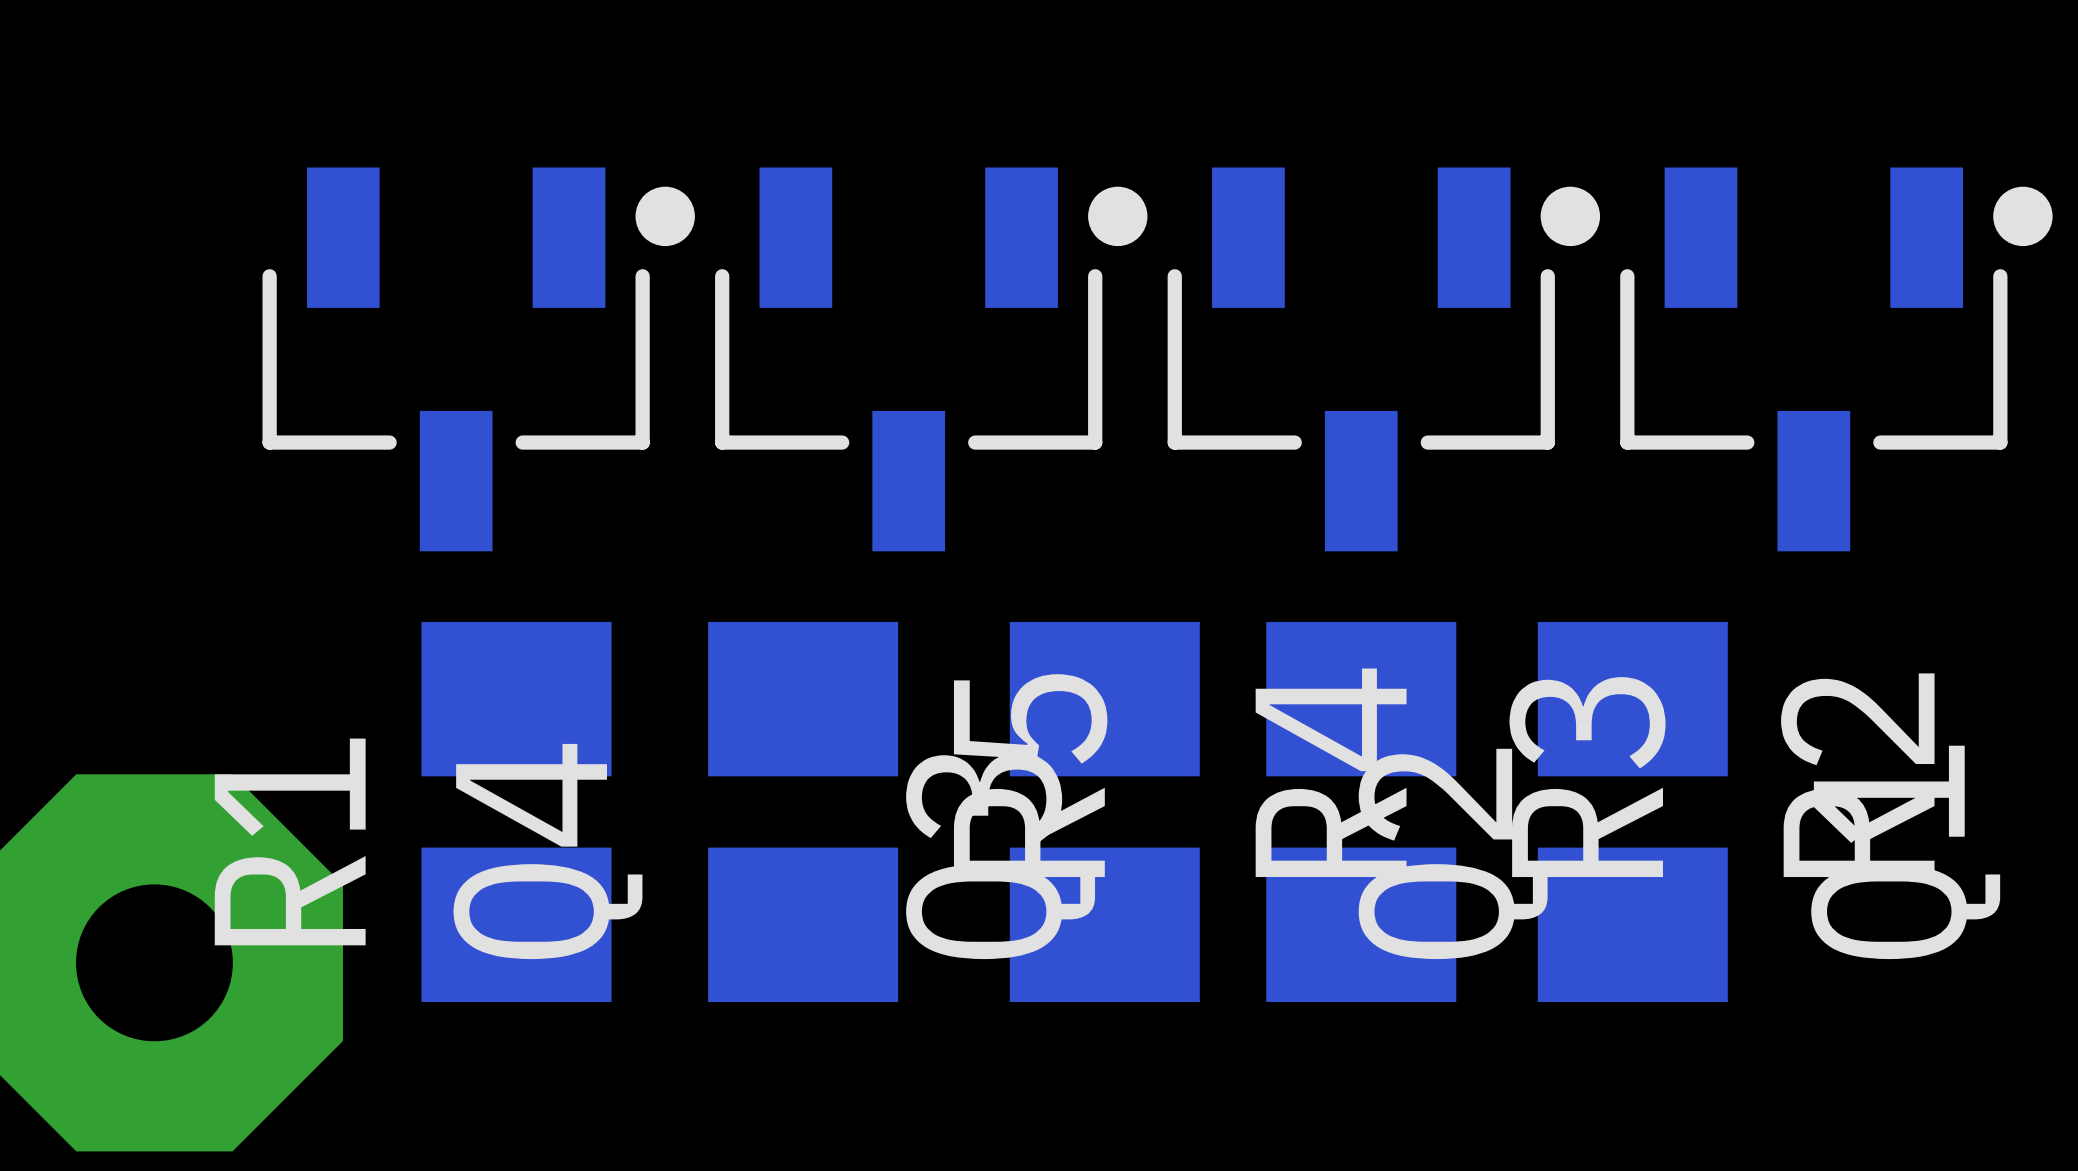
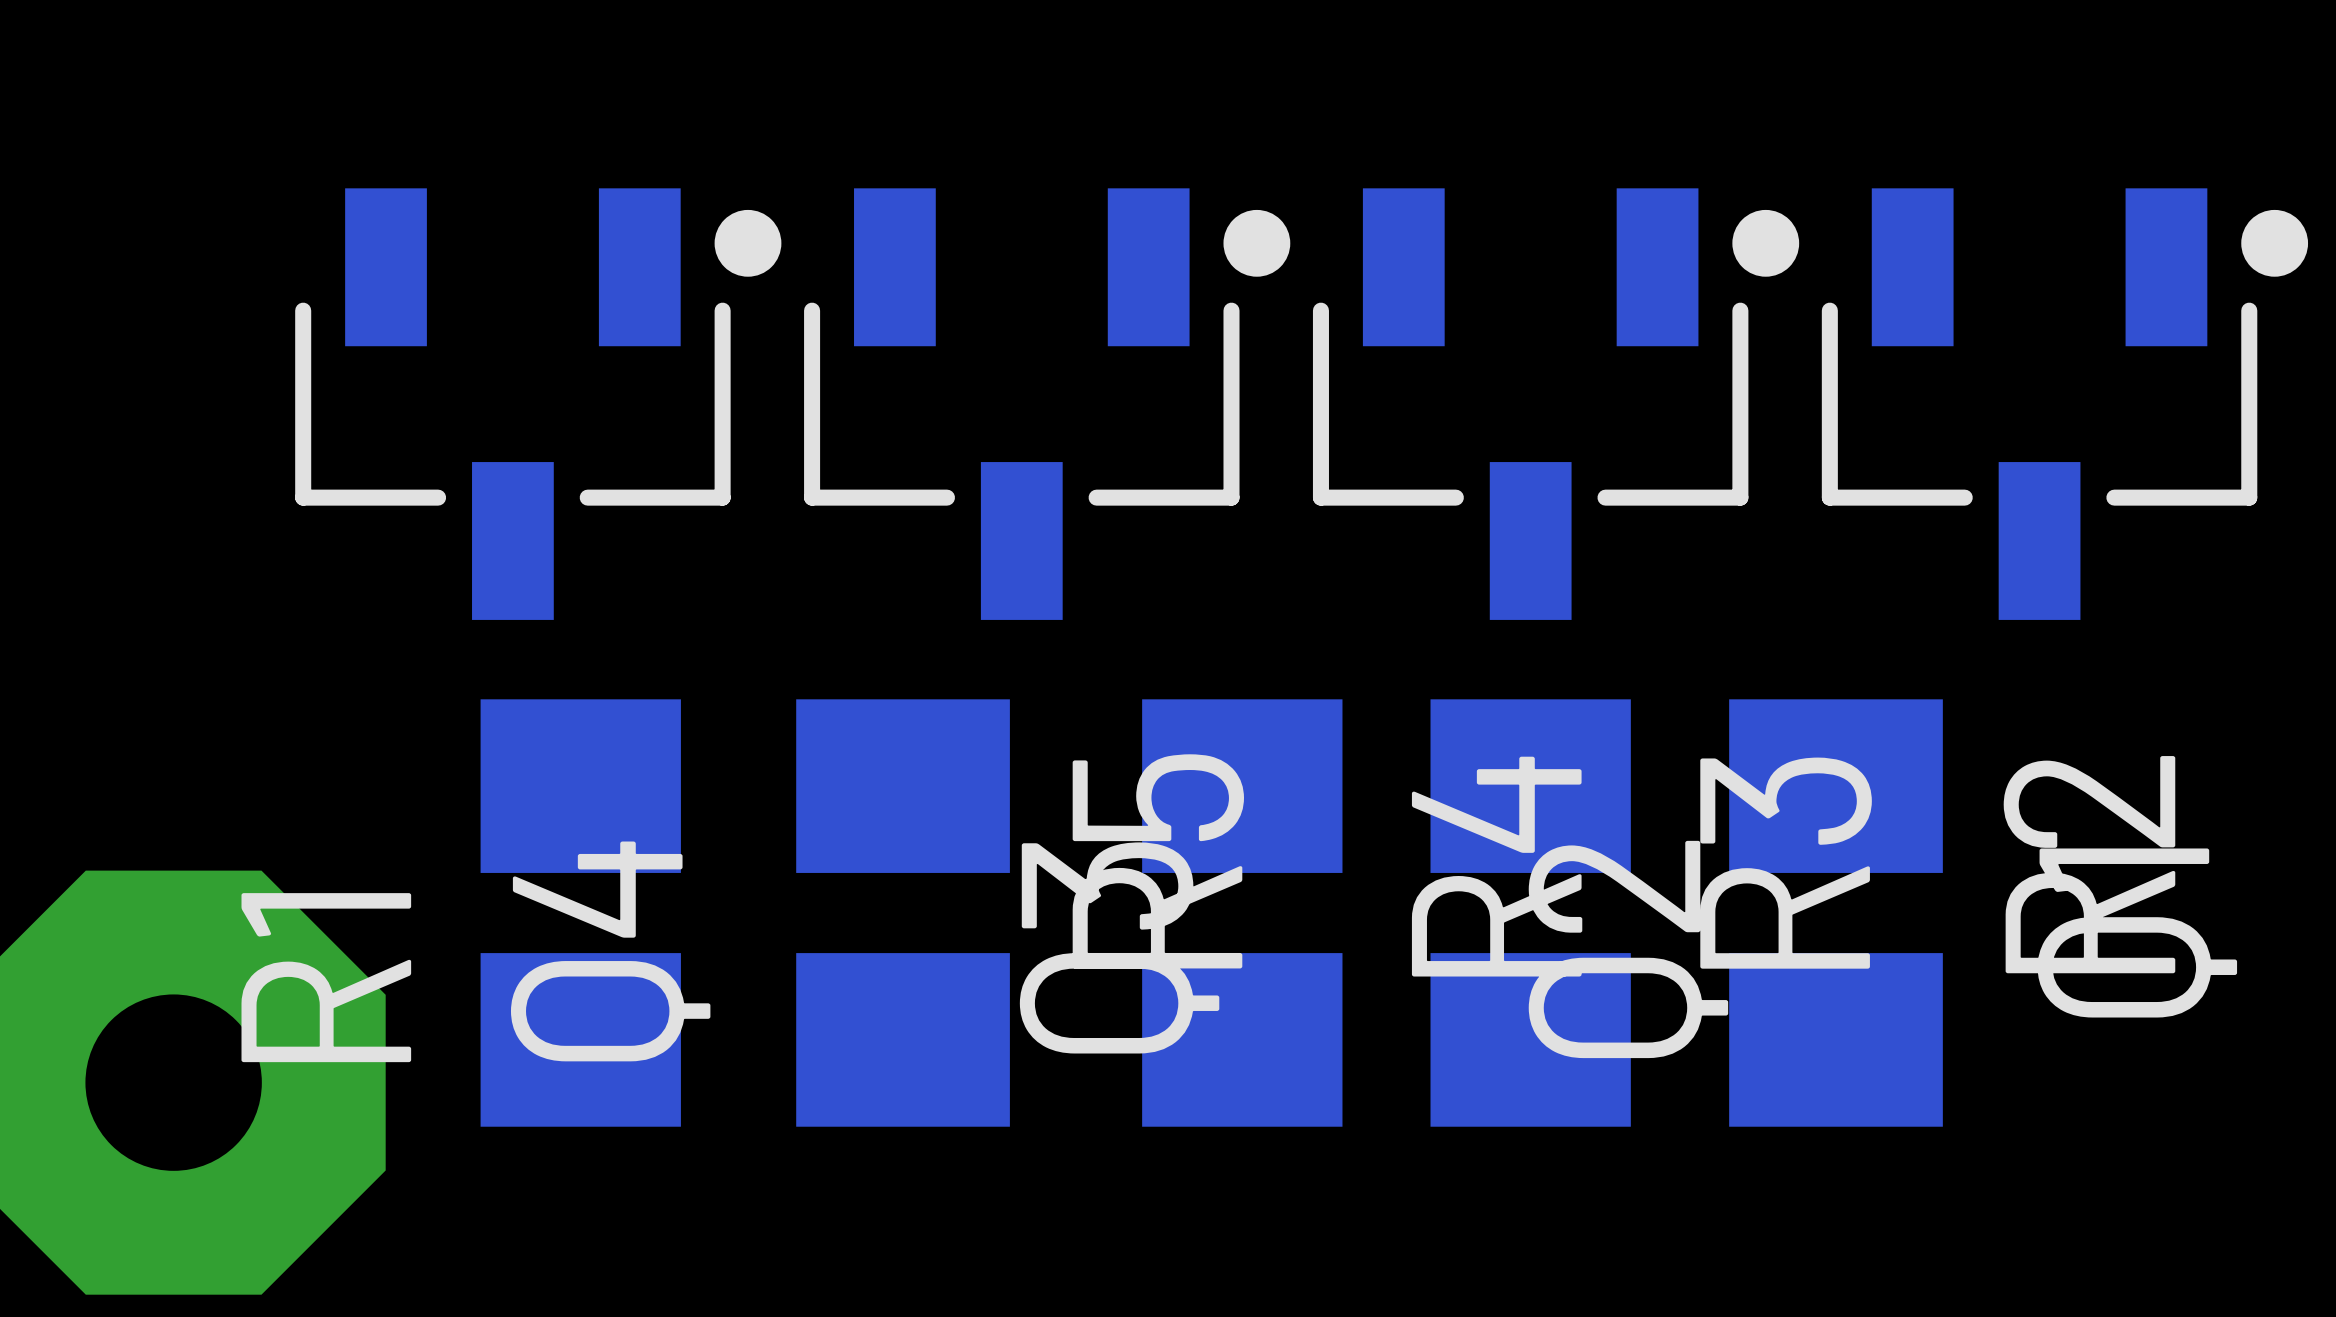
R1 footprint: [421, 621, 612, 1003] -> [480, 699, 681, 1127]
R4 footprint: [1009, 621, 1200, 1003] -> [1142, 699, 1343, 1127]
R3 footprint: [1266, 621, 1457, 1003] -> [1430, 699, 1631, 1127]

